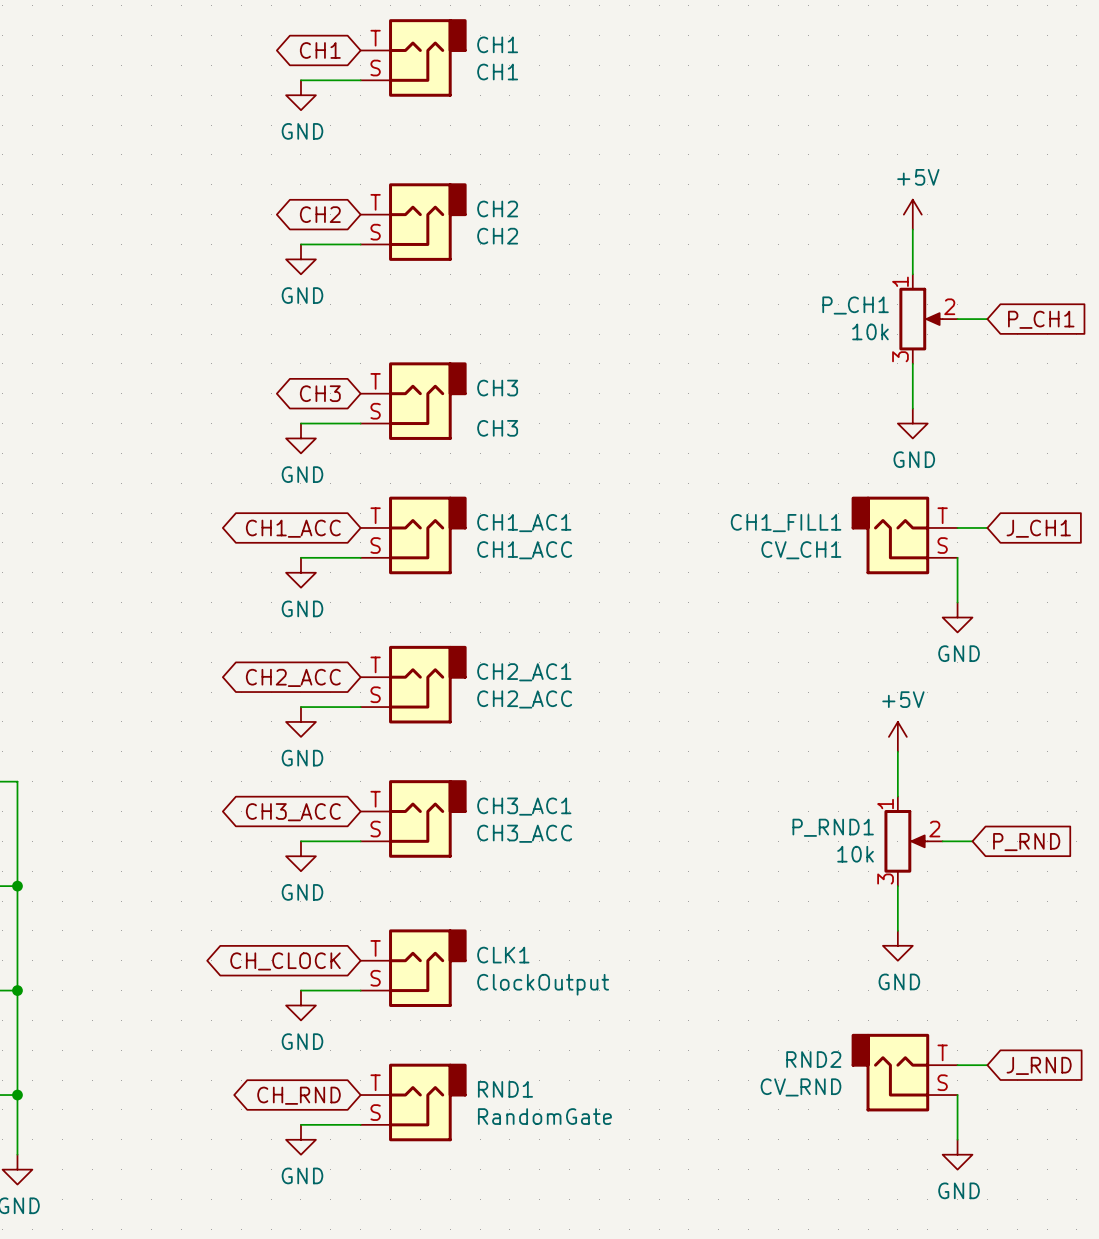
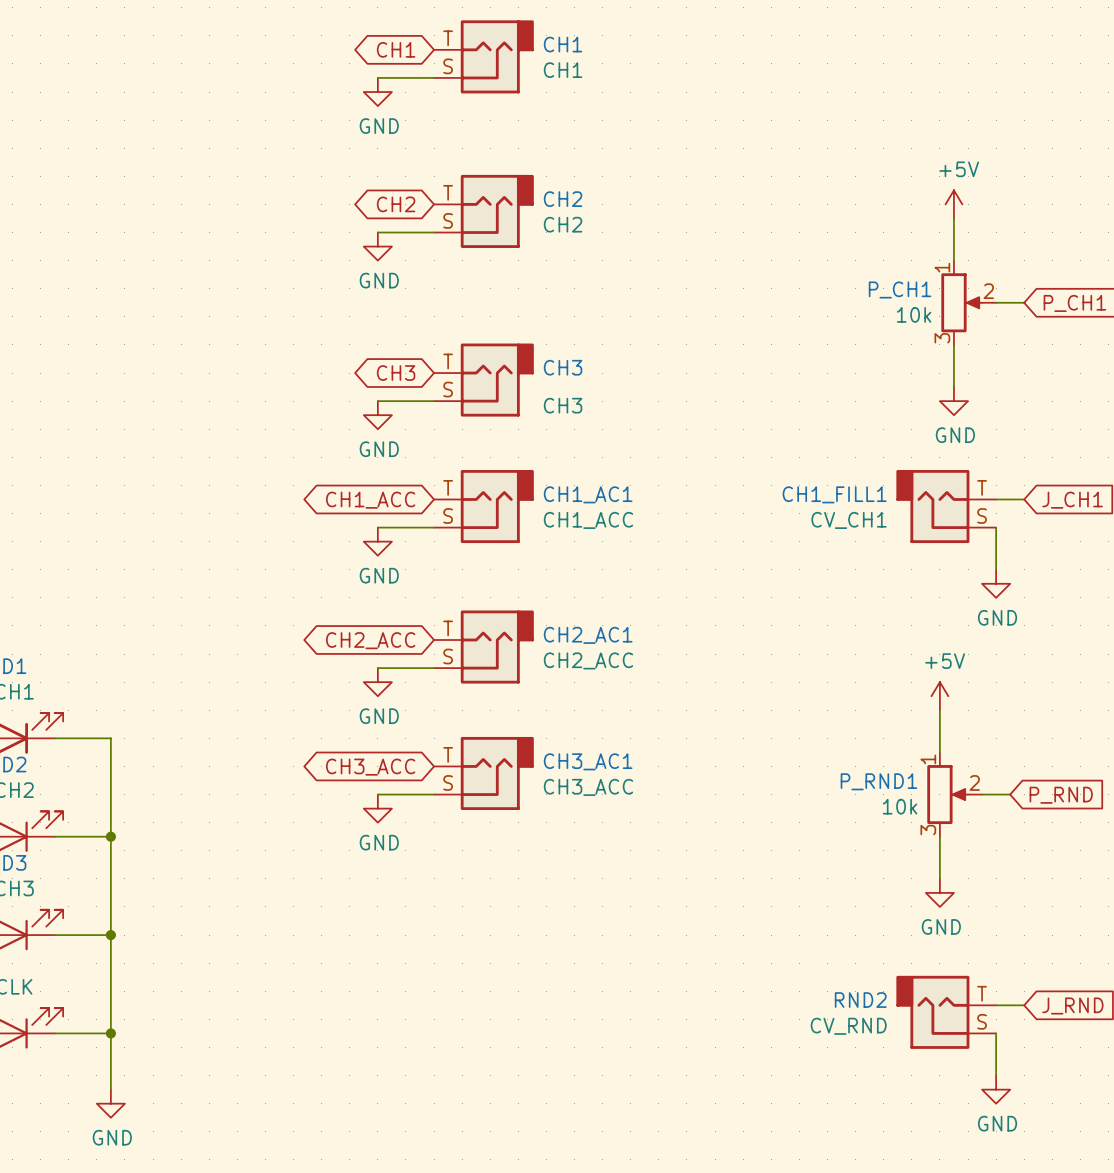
global label: CH_CLOCK (285, 961) -> none
CLK1: ClockOutput (413, 968) -> none
wire: (300, 990) (360, 990) -> none
power symbol: GND (300, 1005) -> none
global label: CH_RND (299, 1095) -> none
RND1: RandomGate (413, 1102) -> none
wire: (300, 1124) (360, 1124) -> none
power symbol: GND (300, 1139) -> none

